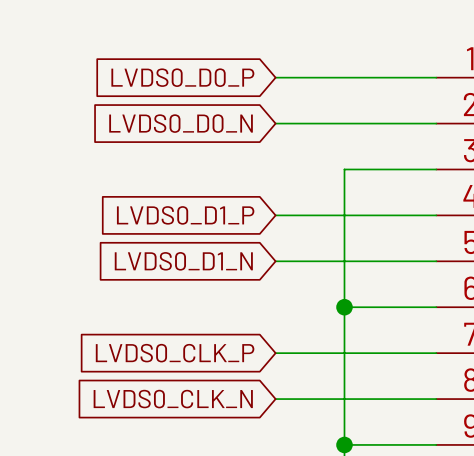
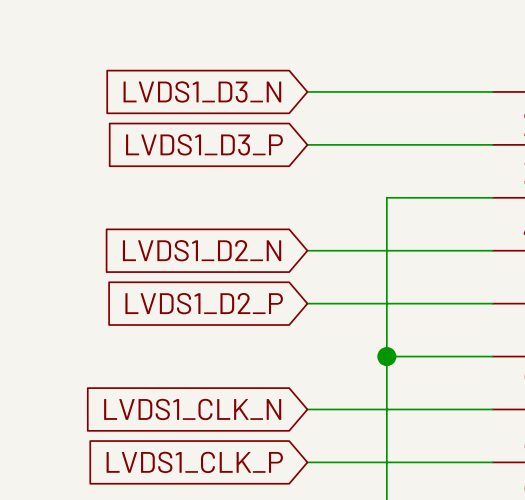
global label: LVDS0_D0_P (182, 77) -> LVDS1_D3_N (202, 91)
global label: LVDS0_D0_N (181, 123) -> LVDS1_D3_P (204, 144)
global label: LVDS0_D1_P (185, 215) -> LVDS1_D2_N (202, 250)
global label: LVDS0_D1_N (183, 261) -> LVDS1_D2_P (204, 303)
global label: LVDS0_CLK_P (175, 353) -> LVDS1_CLK_N (192, 409)
global label: LVDS0_CLK_N (173, 399) -> LVDS1_CLK_P (194, 462)

